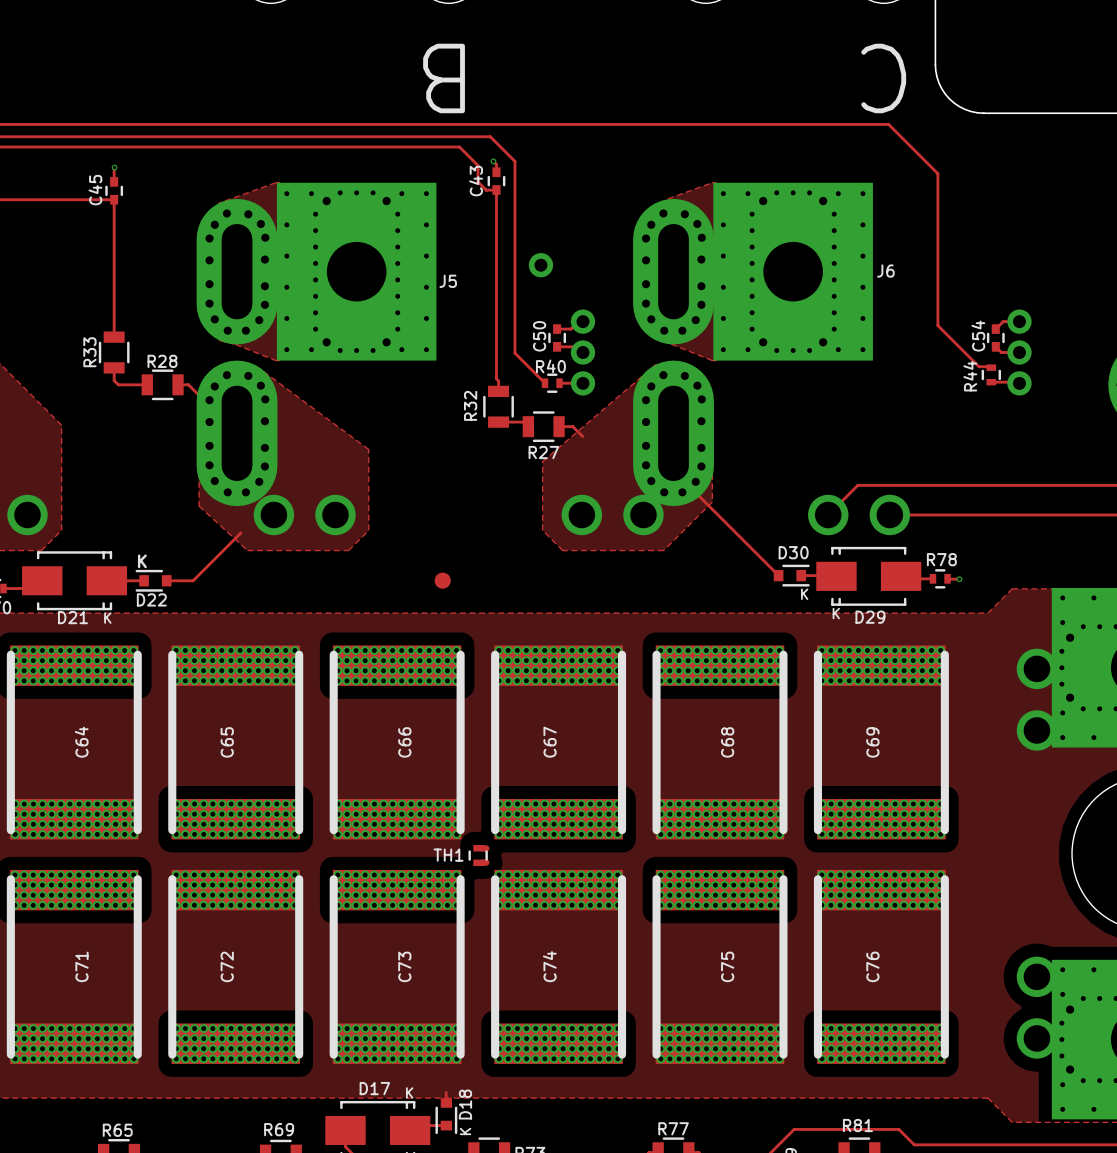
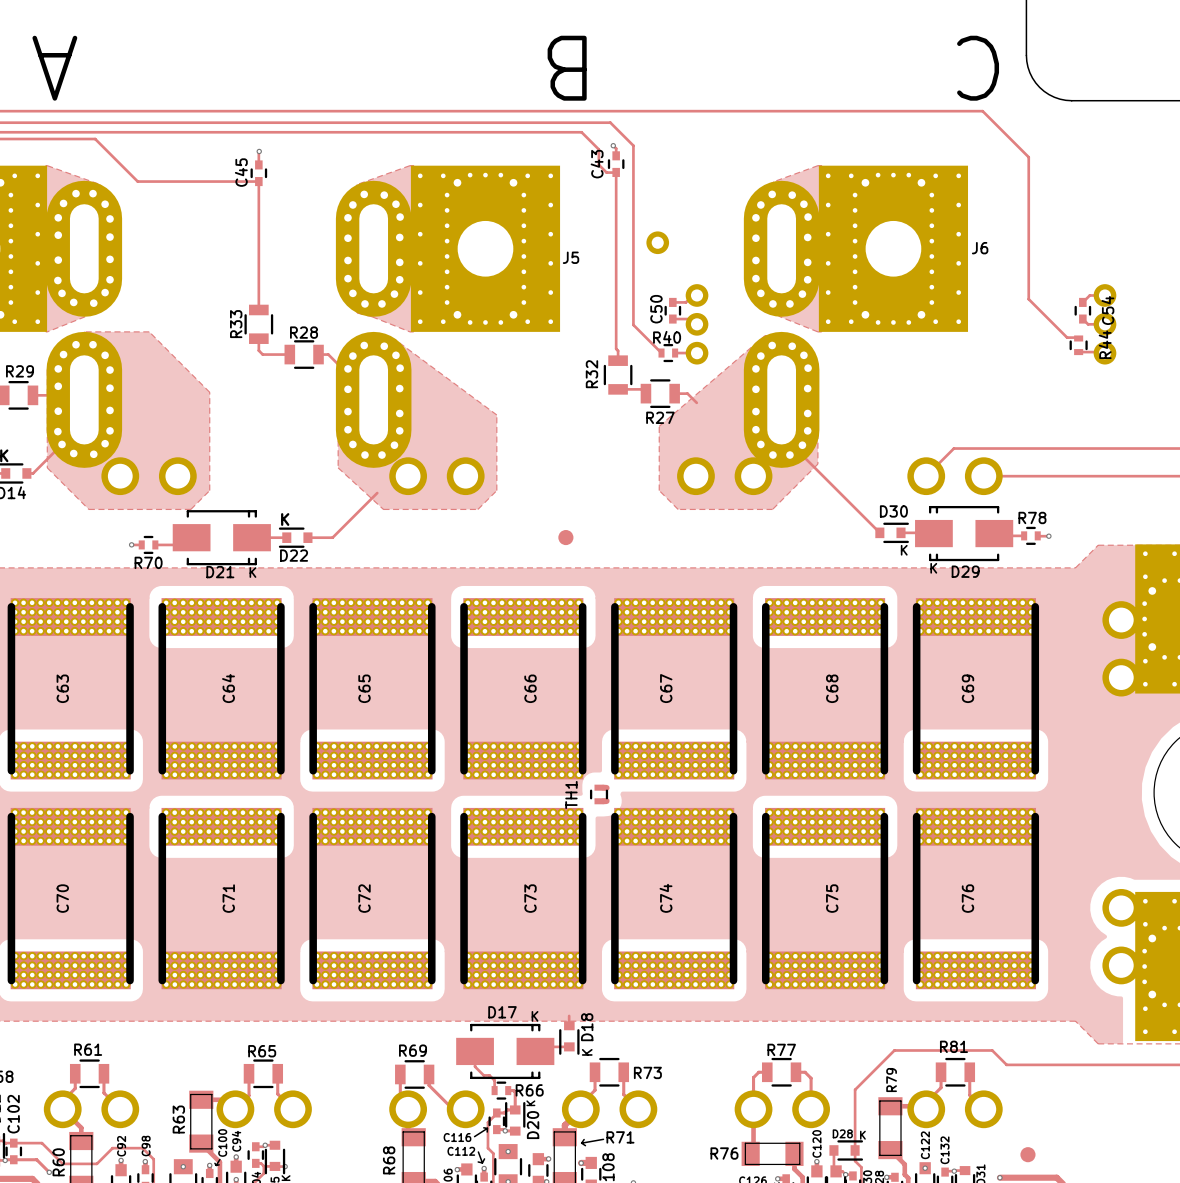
C54 name position: C54 (978, 336) -> C54 (1107, 310)
R44 name position: R44 (970, 376) -> R44 (1105, 344)
TH1 name rotation: 0° (448, 855) -> 90° counterclockwise (571, 794)

